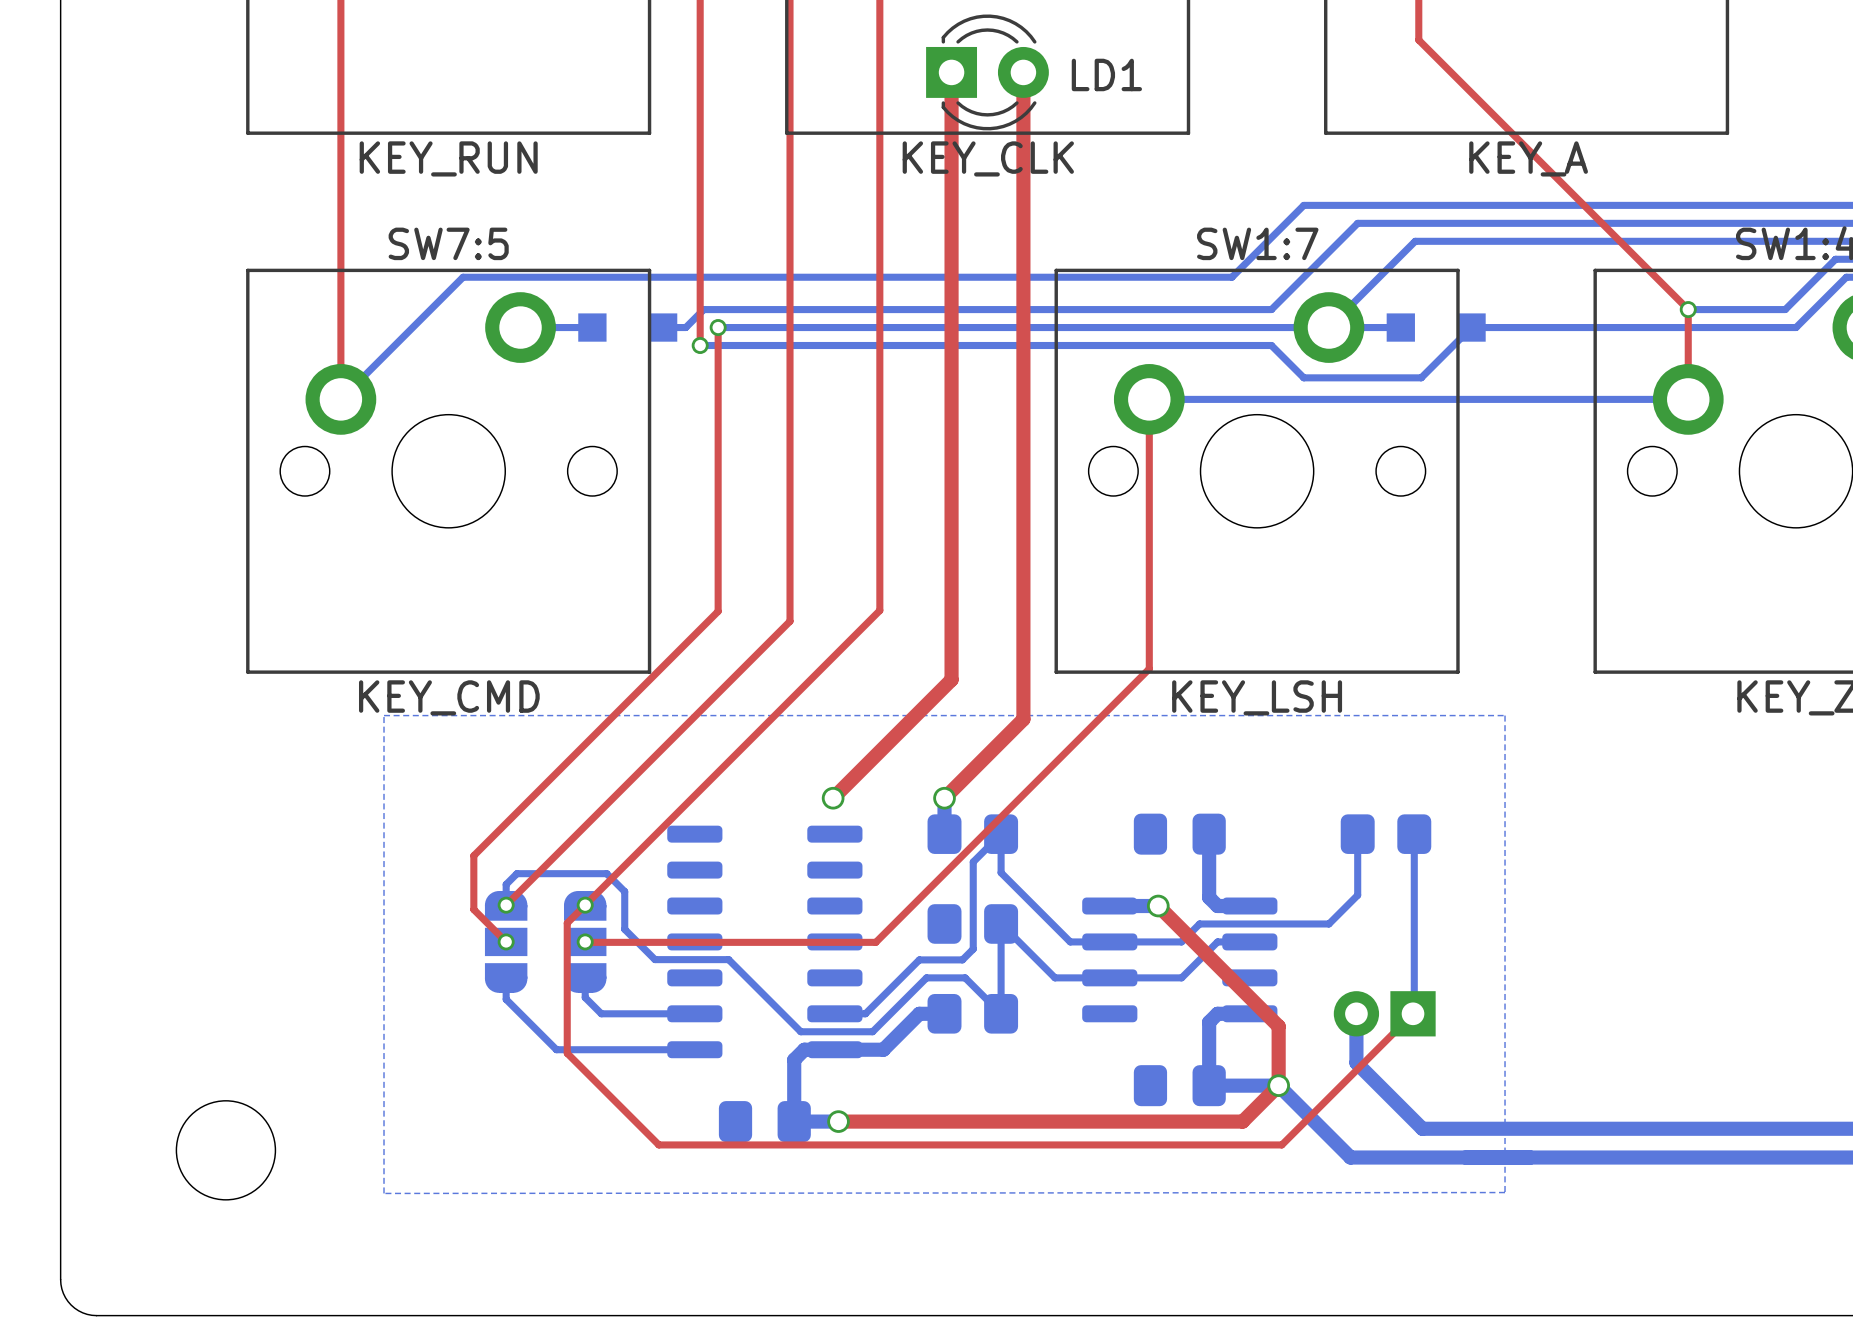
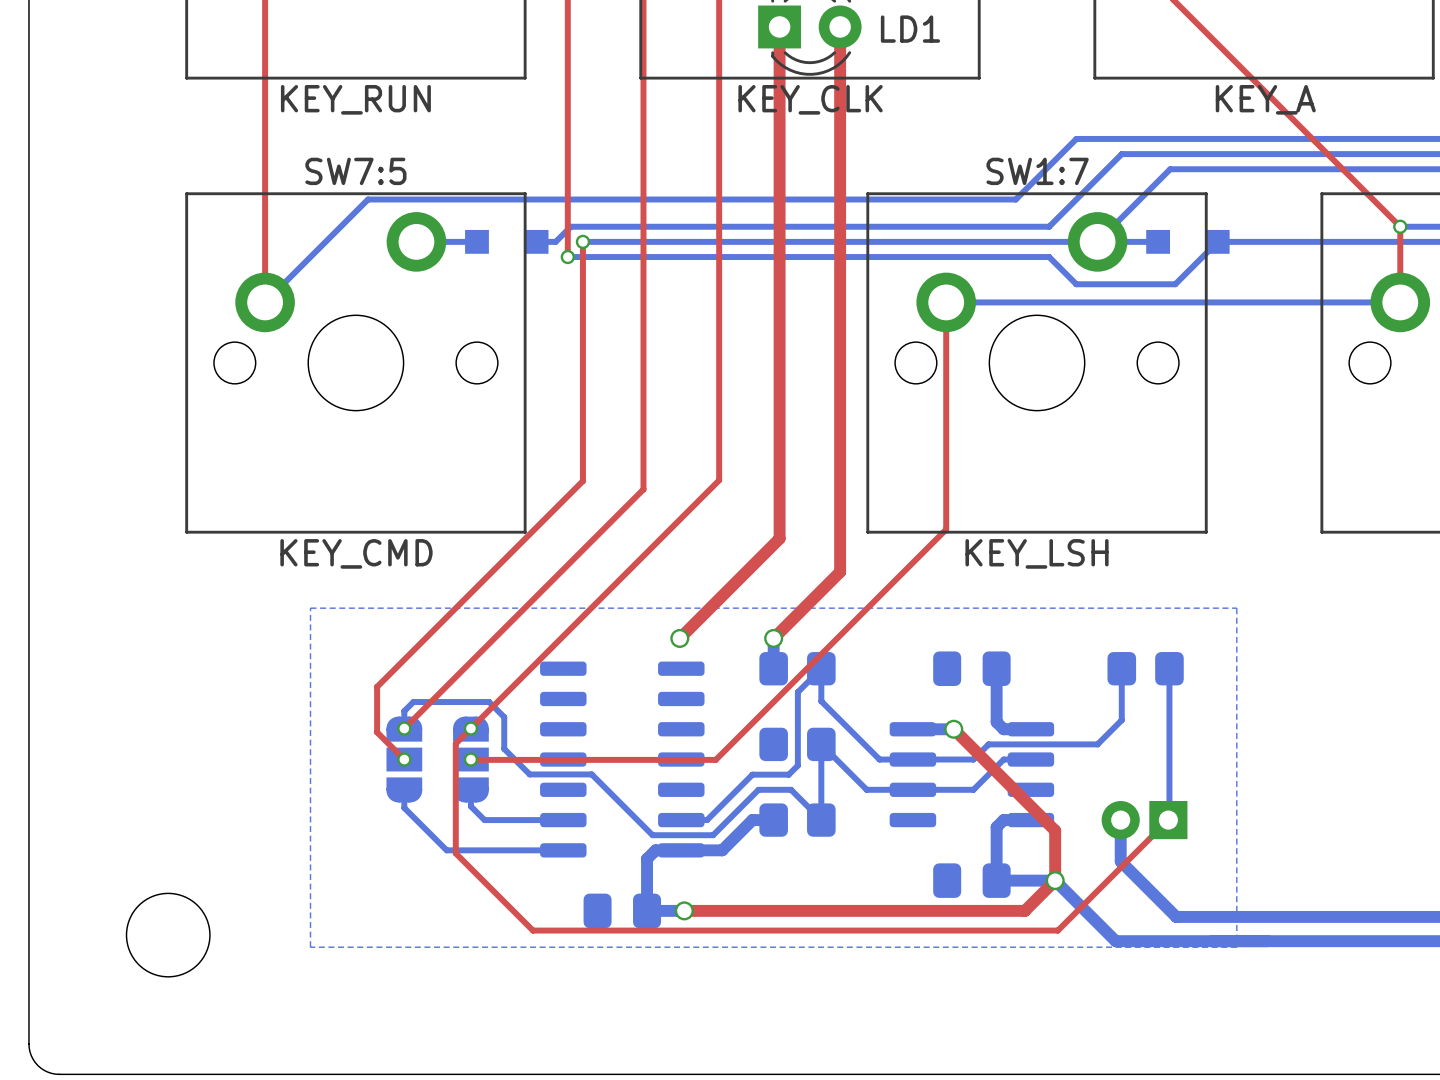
bottom zone outline: (384, 715) (384, 1193) (1505, 1192) (1505, 715) (384, 715) -> (310, 608) (310, 947) (1236, 947) (1236, 608) (310, 608)

